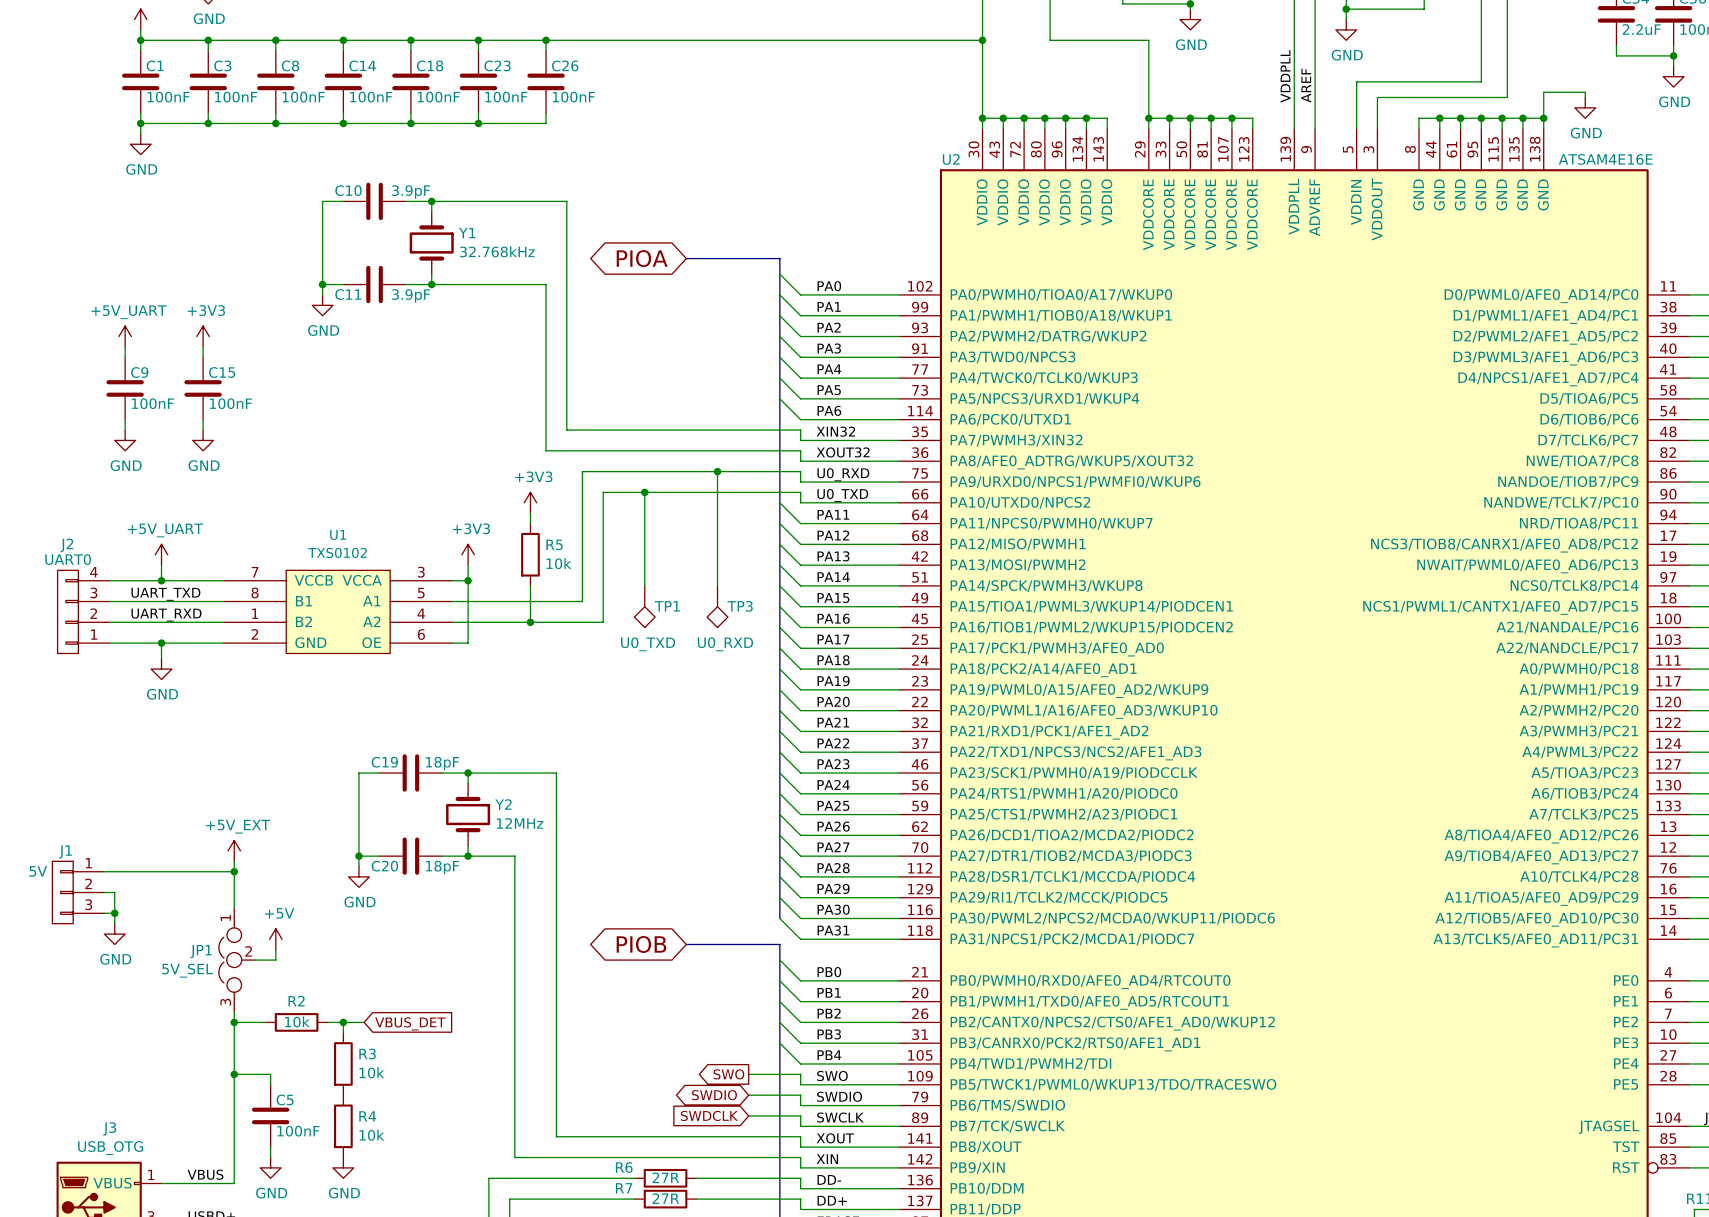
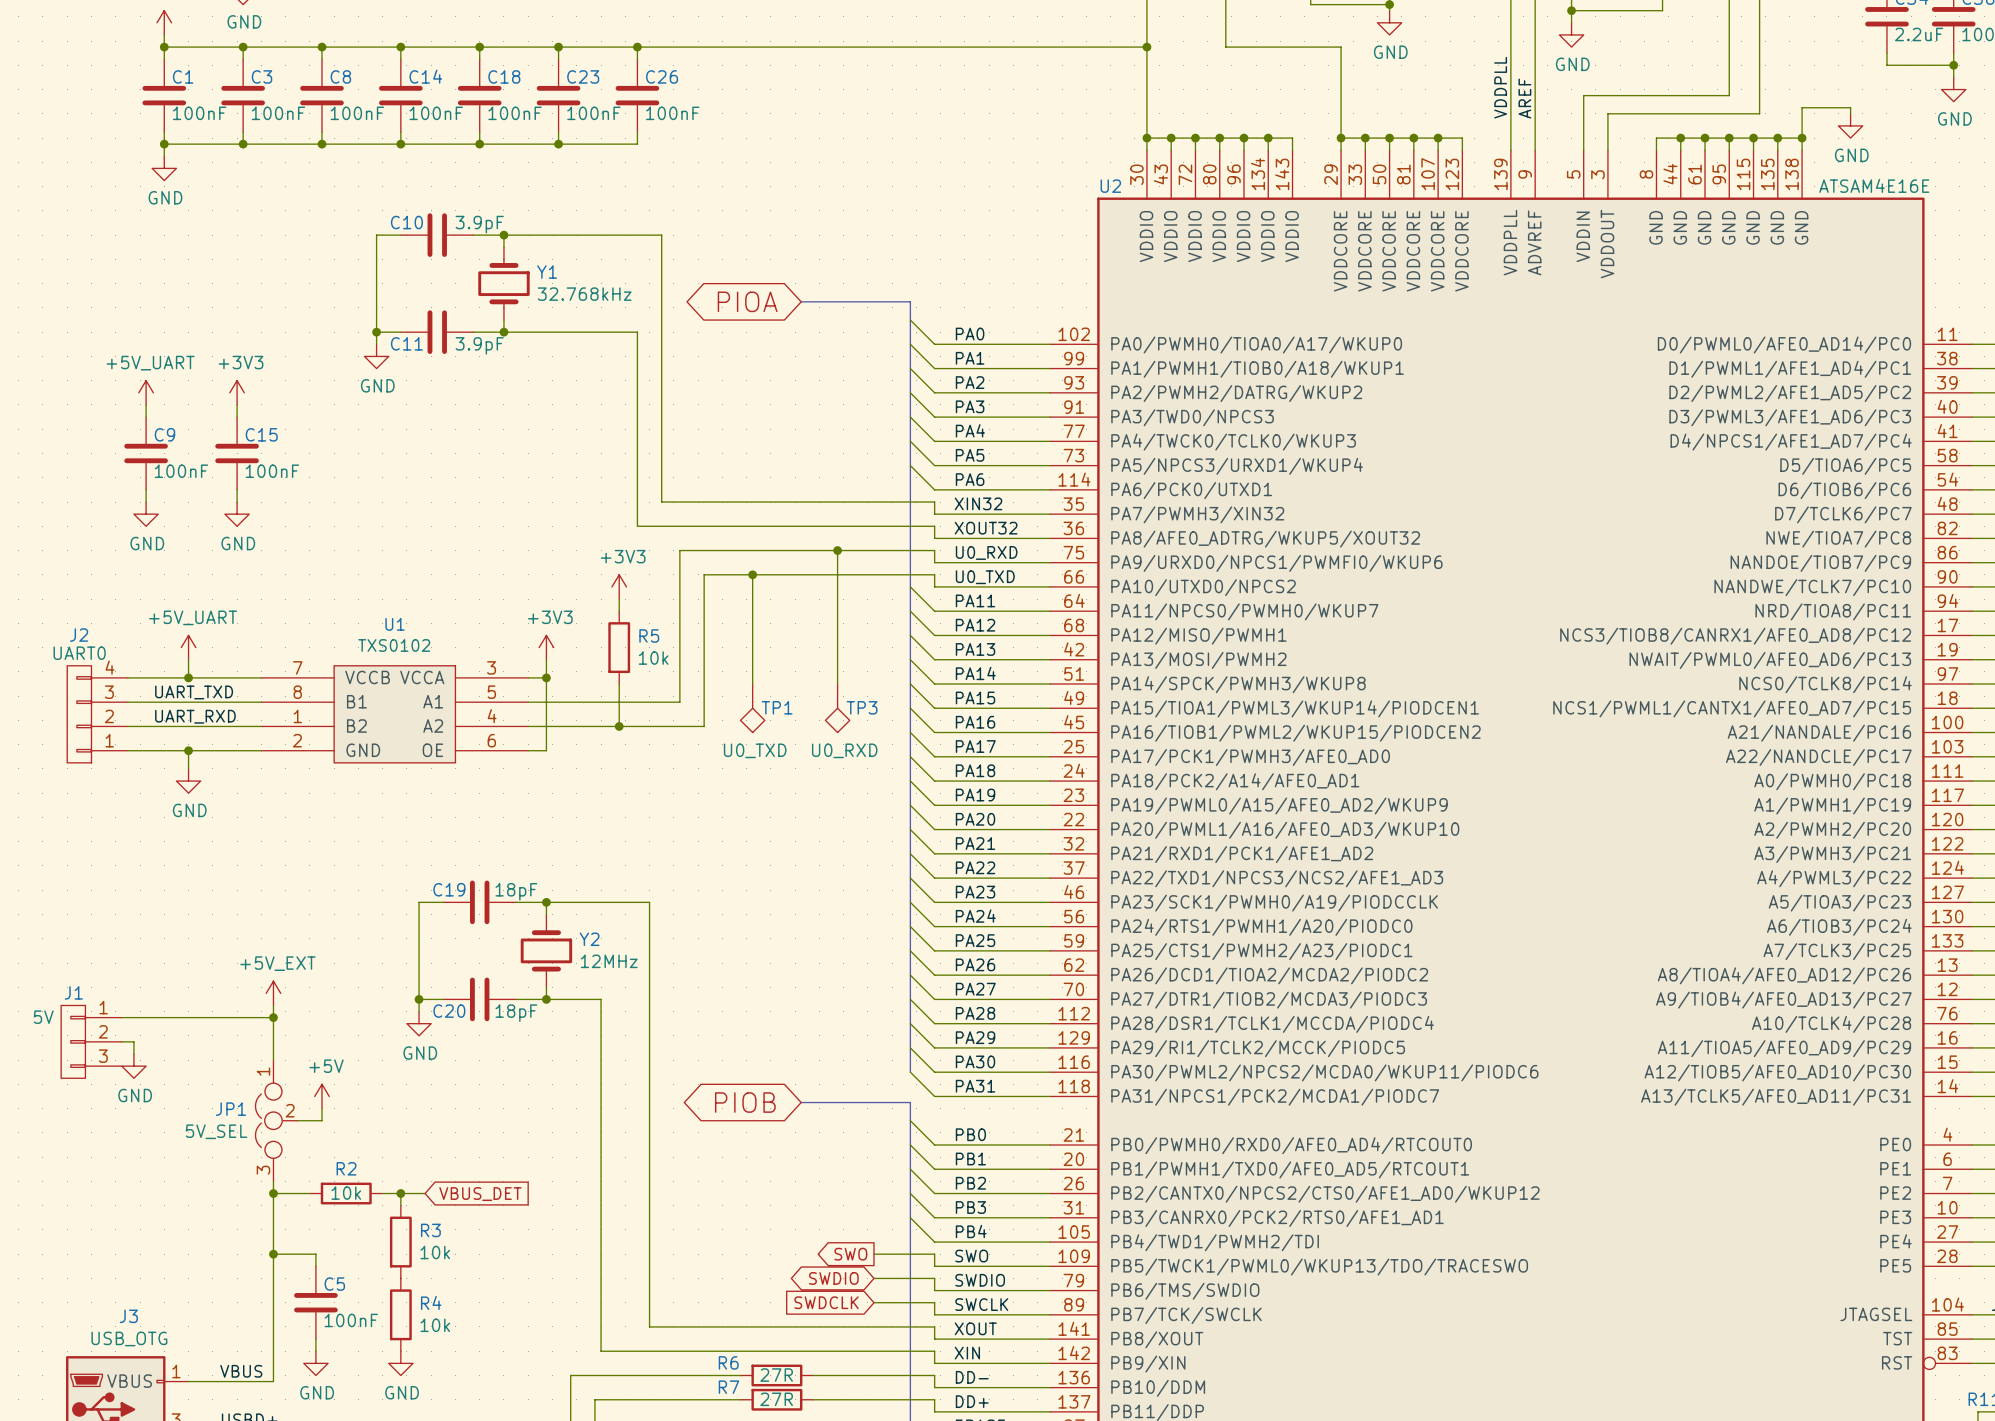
junction: (114, 913) -> none
power symbol position: GND (114, 934) -> GND (133, 1066)

